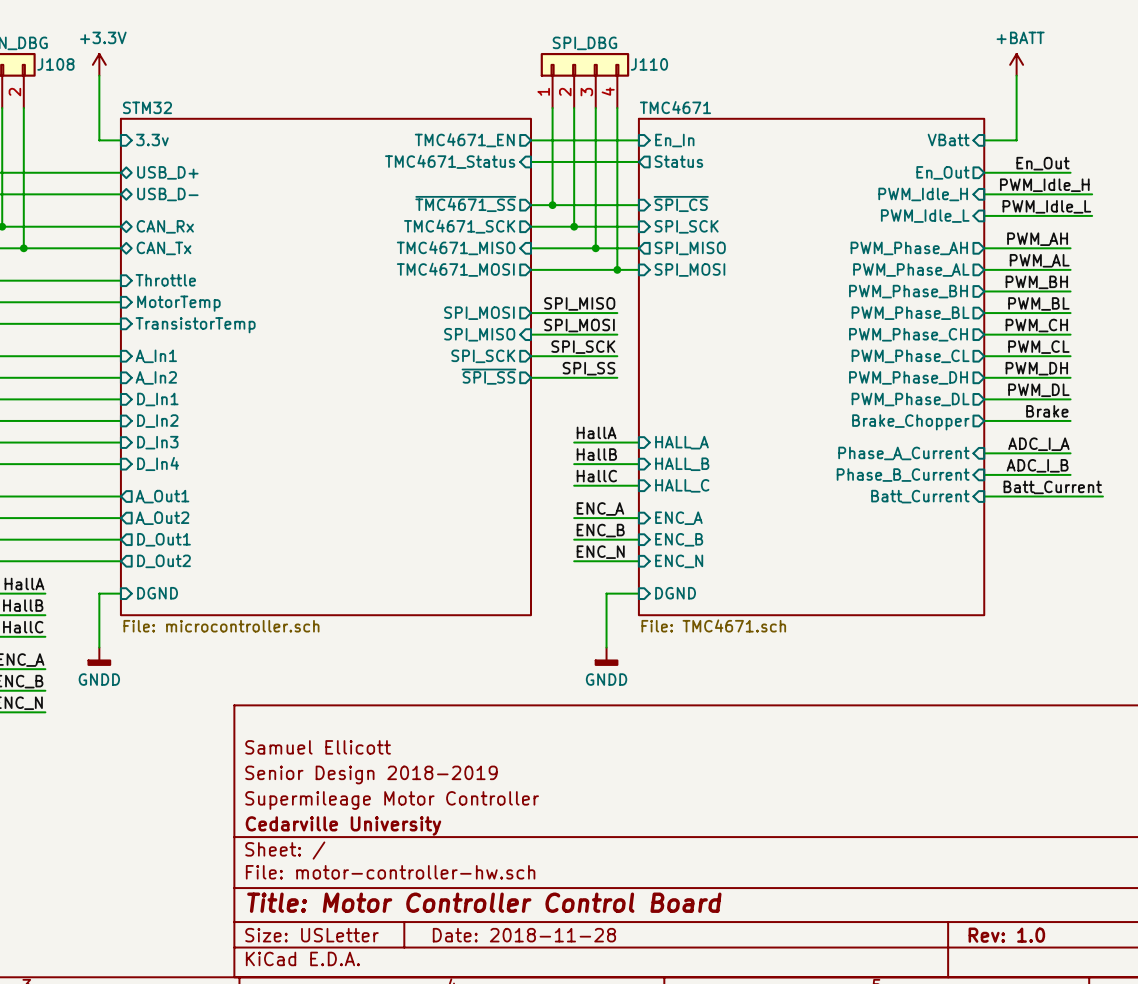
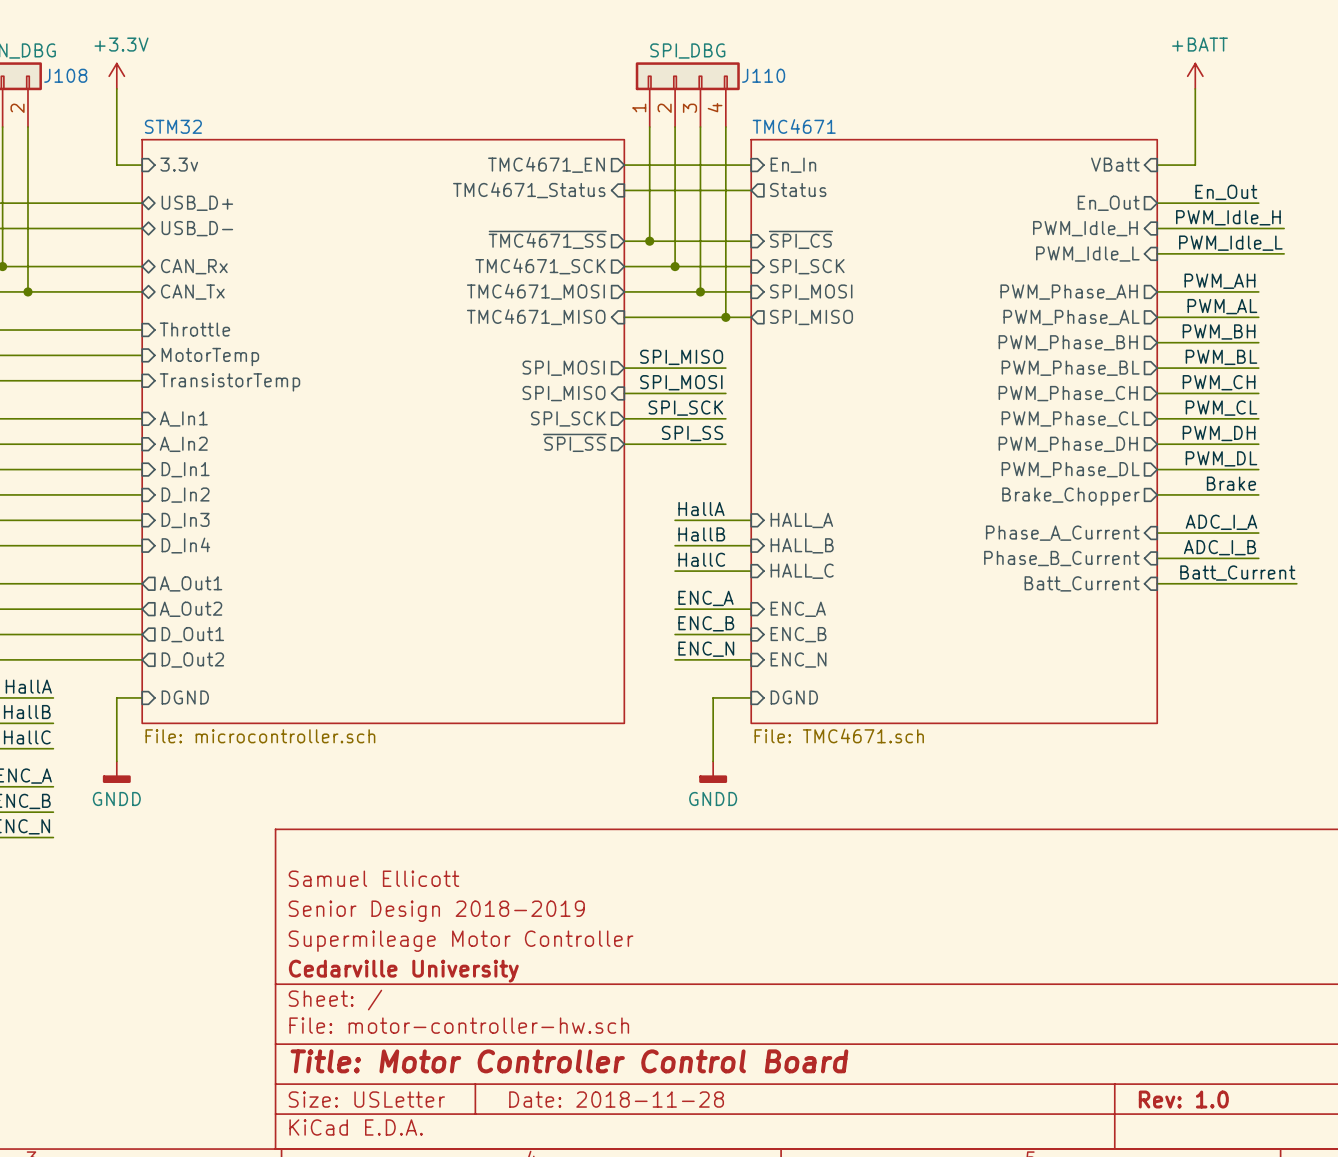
sheet pin shape: input (456, 248) -> output (535, 291)
sheet pin: TMC4671_MISO (456, 248) -> TMC4671_MOSI (535, 291)
sheet pin shape: output (690, 248) -> input (811, 292)
sheet pin: SPI_MISO (690, 248) -> SPI_MOSI (811, 292)
sheet pin shape: output (455, 269) -> input (536, 317)
sheet pin: TMC4671_MOSI (455, 269) -> TMC4671_MISO (536, 317)
sheet pin shape: input (689, 270) -> output (811, 317)
sheet pin: SPI_MOSI (689, 270) -> SPI_MISO (811, 317)

